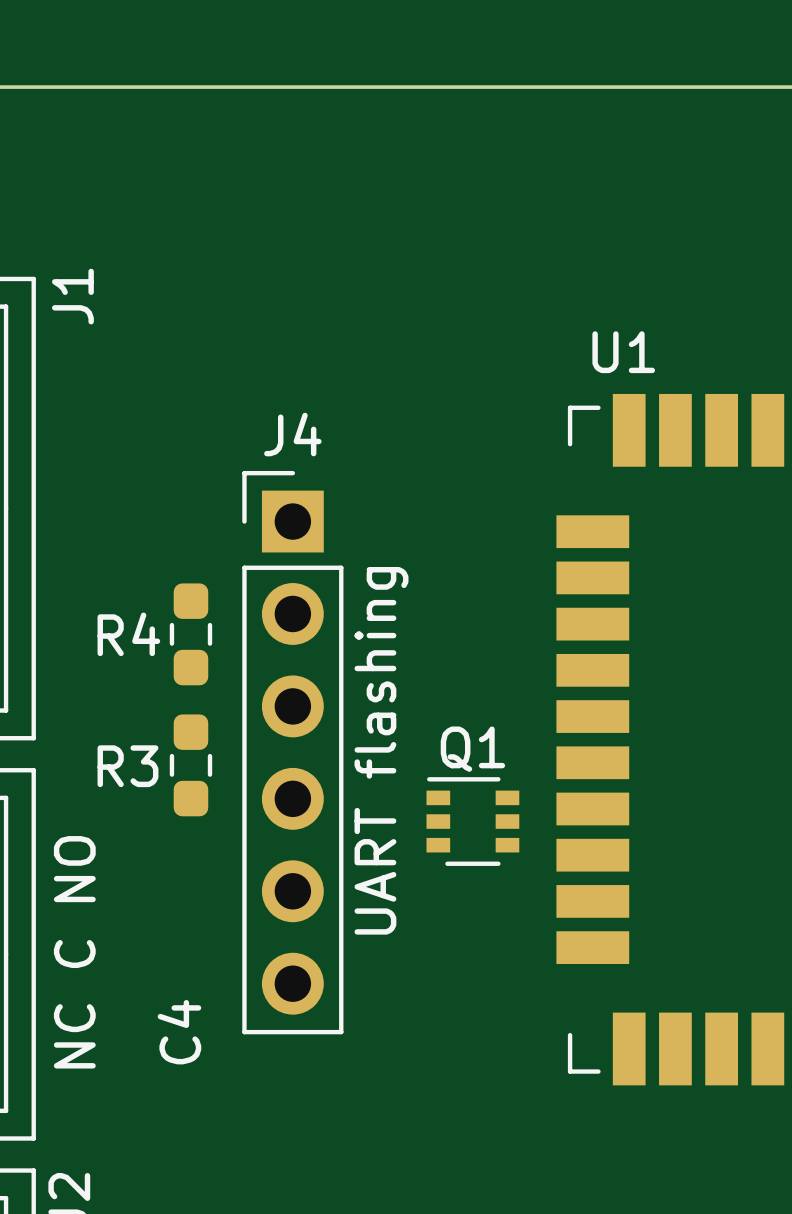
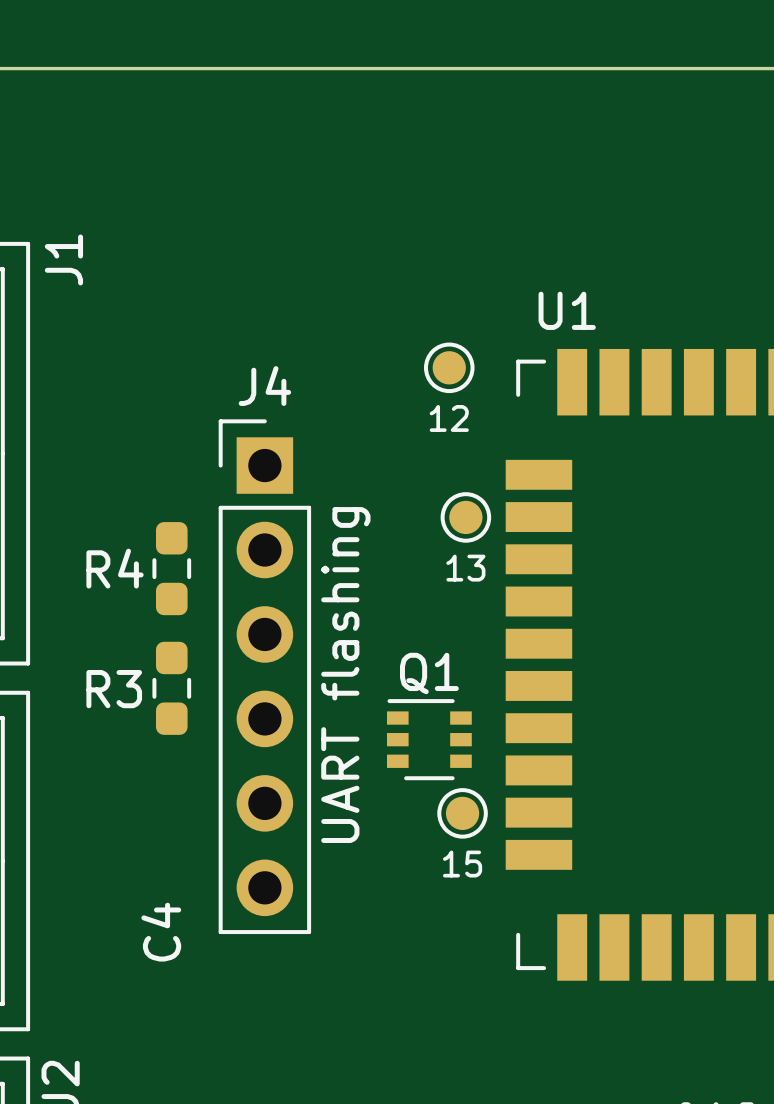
part: none -> 12 (449, 367)
part: none -> 13 (465, 517)
part: none -> 15 (462, 813)
text: NC C NO (74, 952) -> none

